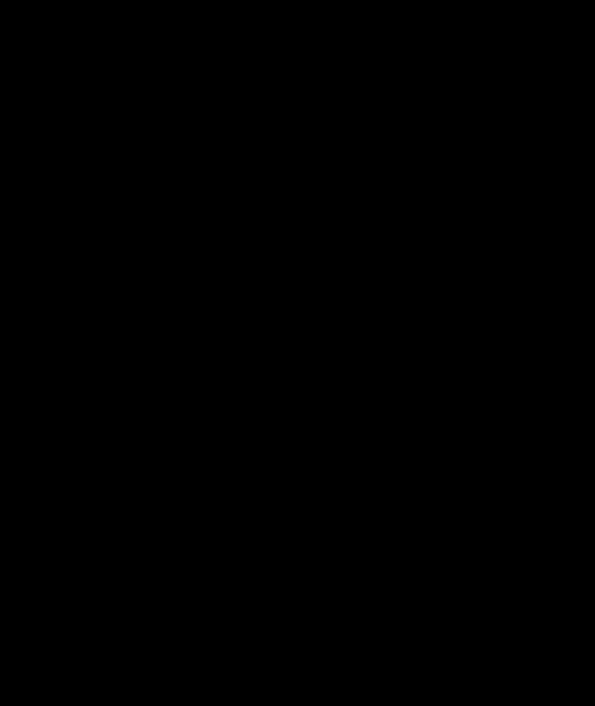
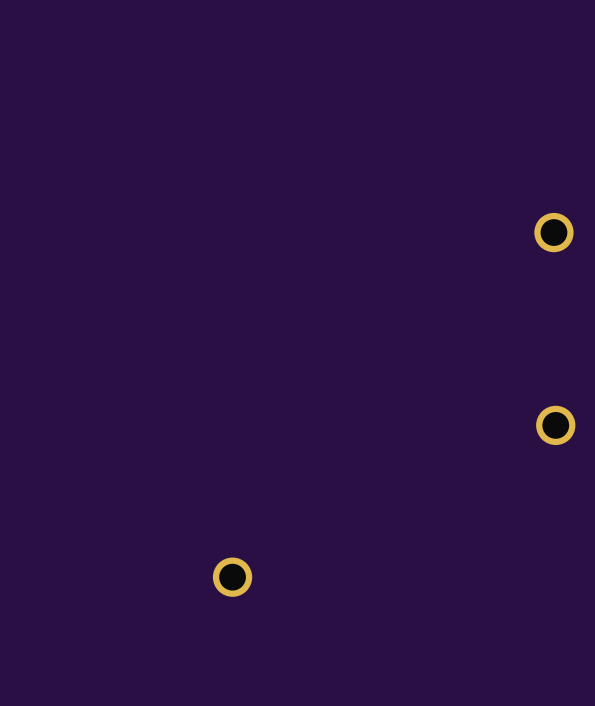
part: none -> (553, 232)
part: none -> (555, 425)
part: none -> (232, 577)

